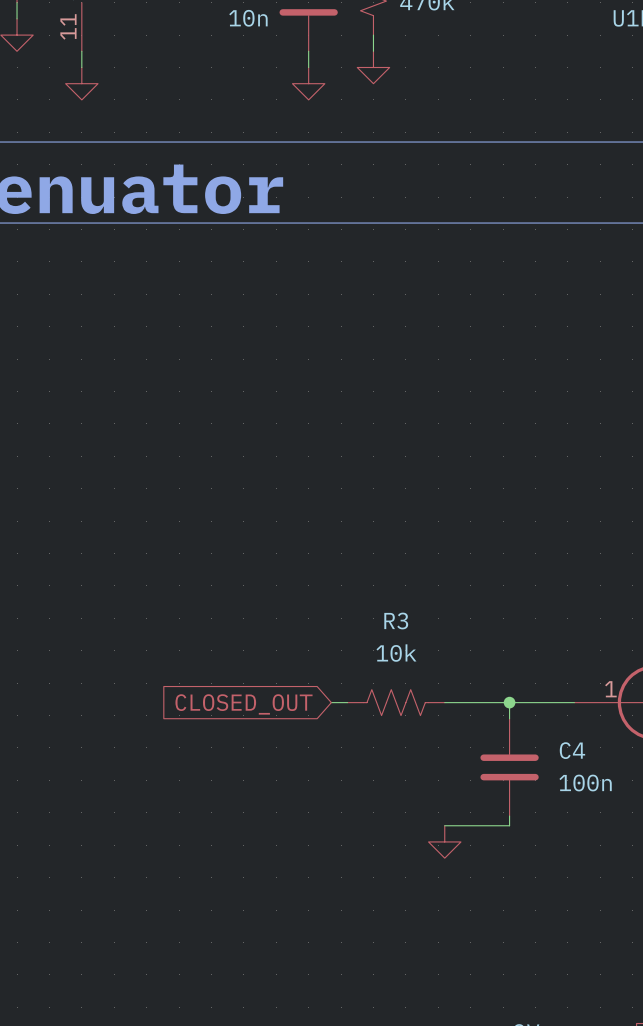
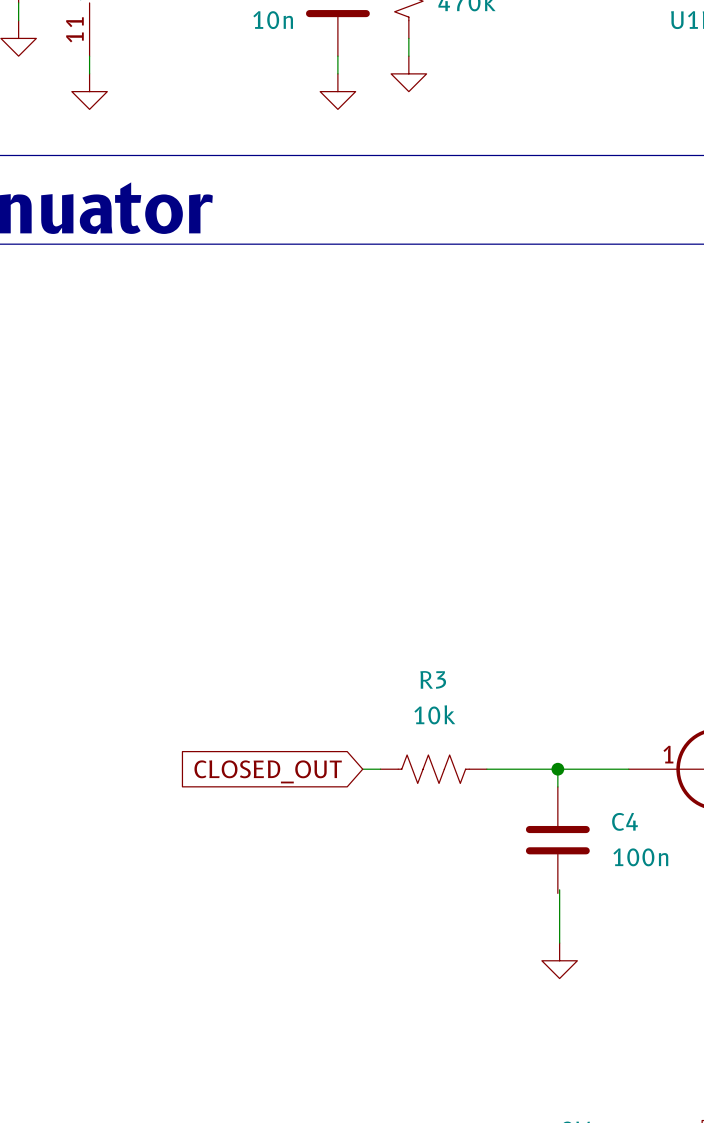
wire: none -> (559, 889) (559, 943)
wire: (509, 816) (509, 825) (444, 825) -> none
power symbol position: (444, 841) -> (559, 960)

